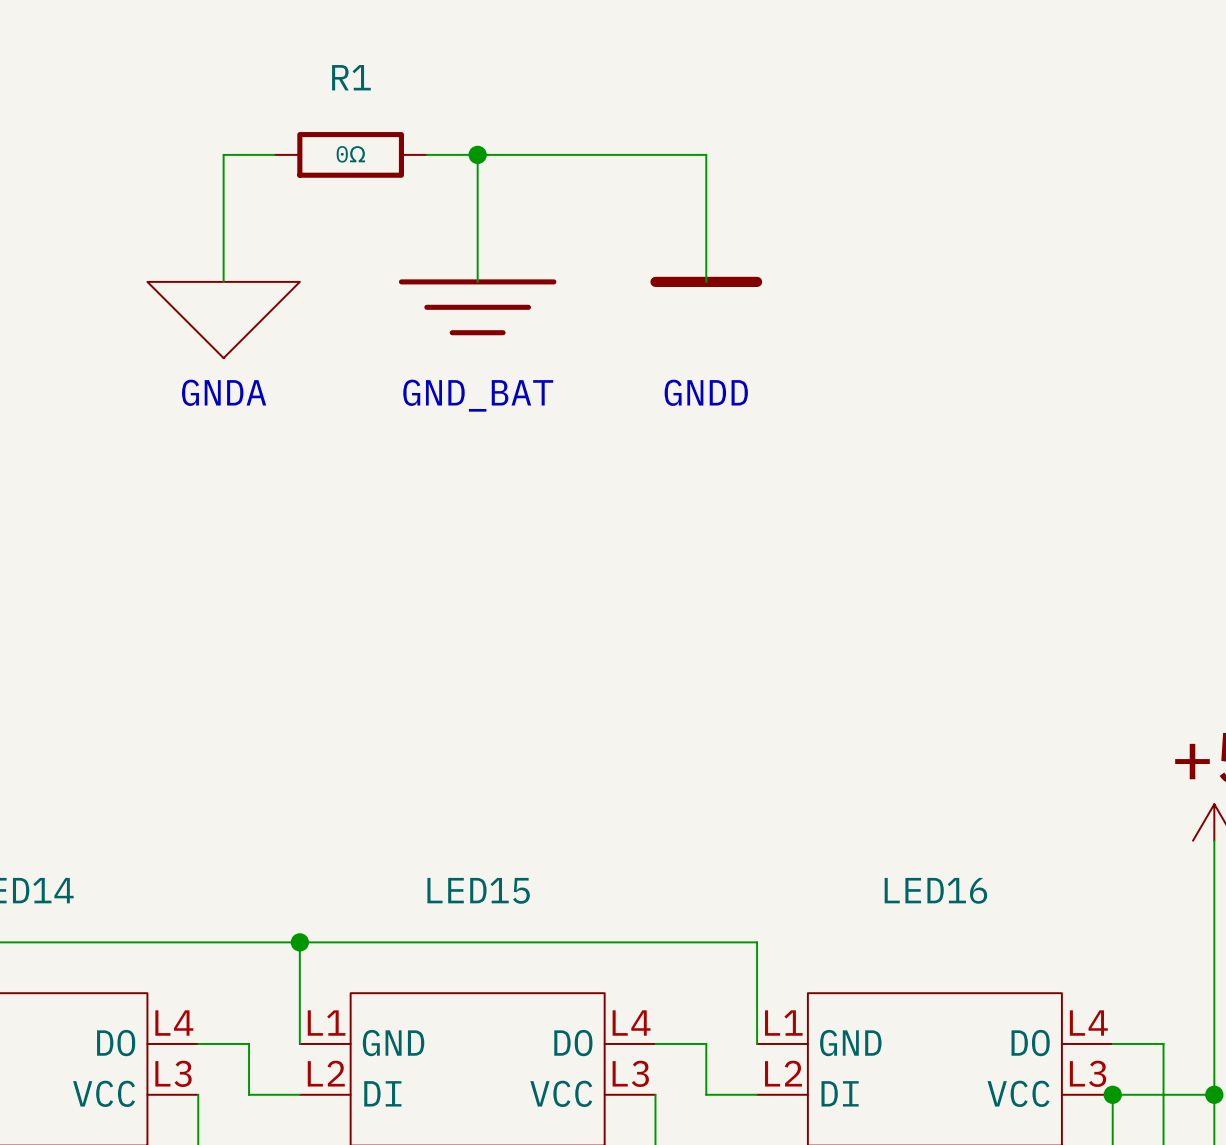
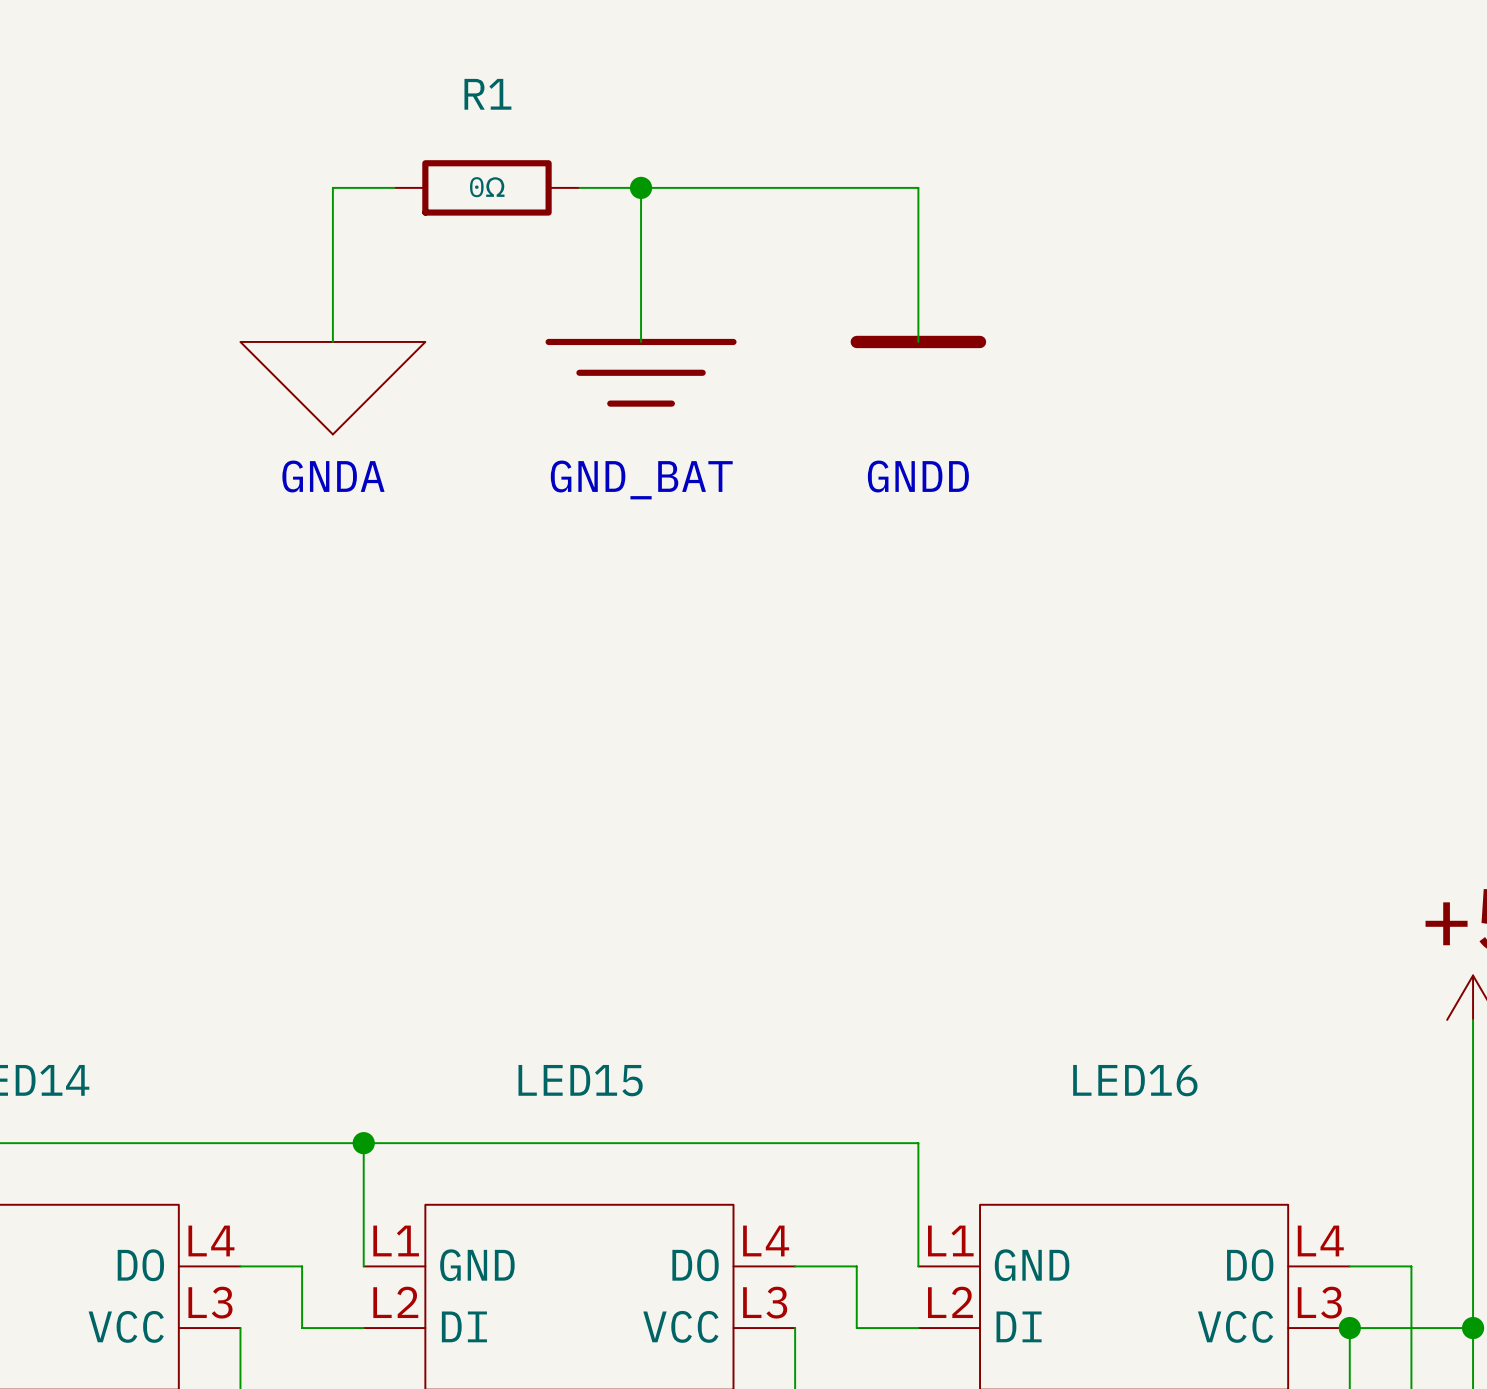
wire: (274, 154) (223, 154) (223, 281) -> (394, 187) (332, 187) (332, 341)
R1 position: (350, 154) -> (486, 187)
wire: (426, 154) (477, 154) (477, 281) -> none
junction position: (477, 154) -> (641, 187)
wire: none -> (641, 187) (641, 341)
wire: (706, 154) (706, 281) -> (856, 187) (918, 187) (918, 341)
power symbol position: (706, 281) -> (918, 341)
power symbol position: (477, 307) -> (641, 372)
power symbol position: (223, 320) -> (332, 388)
text position: GNDA (224, 392) -> GNDA (333, 476)
text position: GNDD (706, 392) -> GNDD (918, 476)
text position: GND_BAT (478, 395) -> GND_BAT (641, 479)

